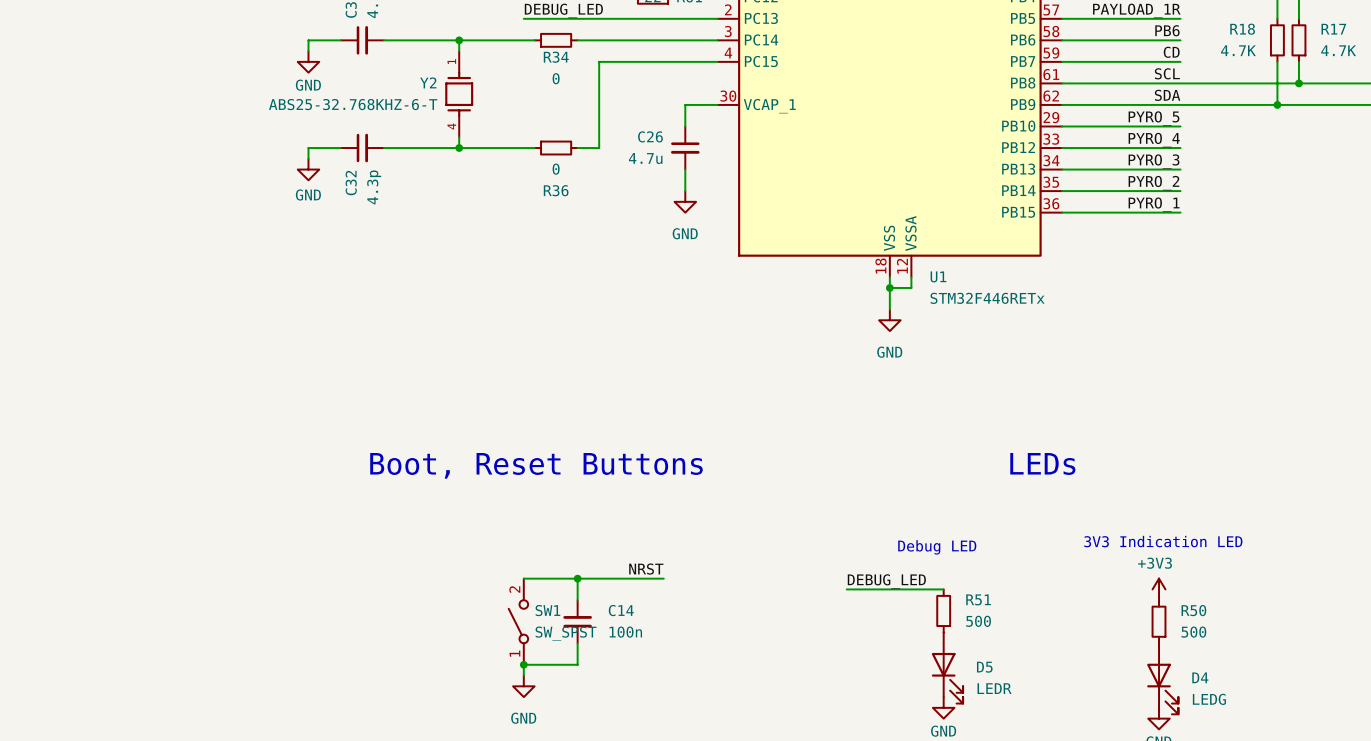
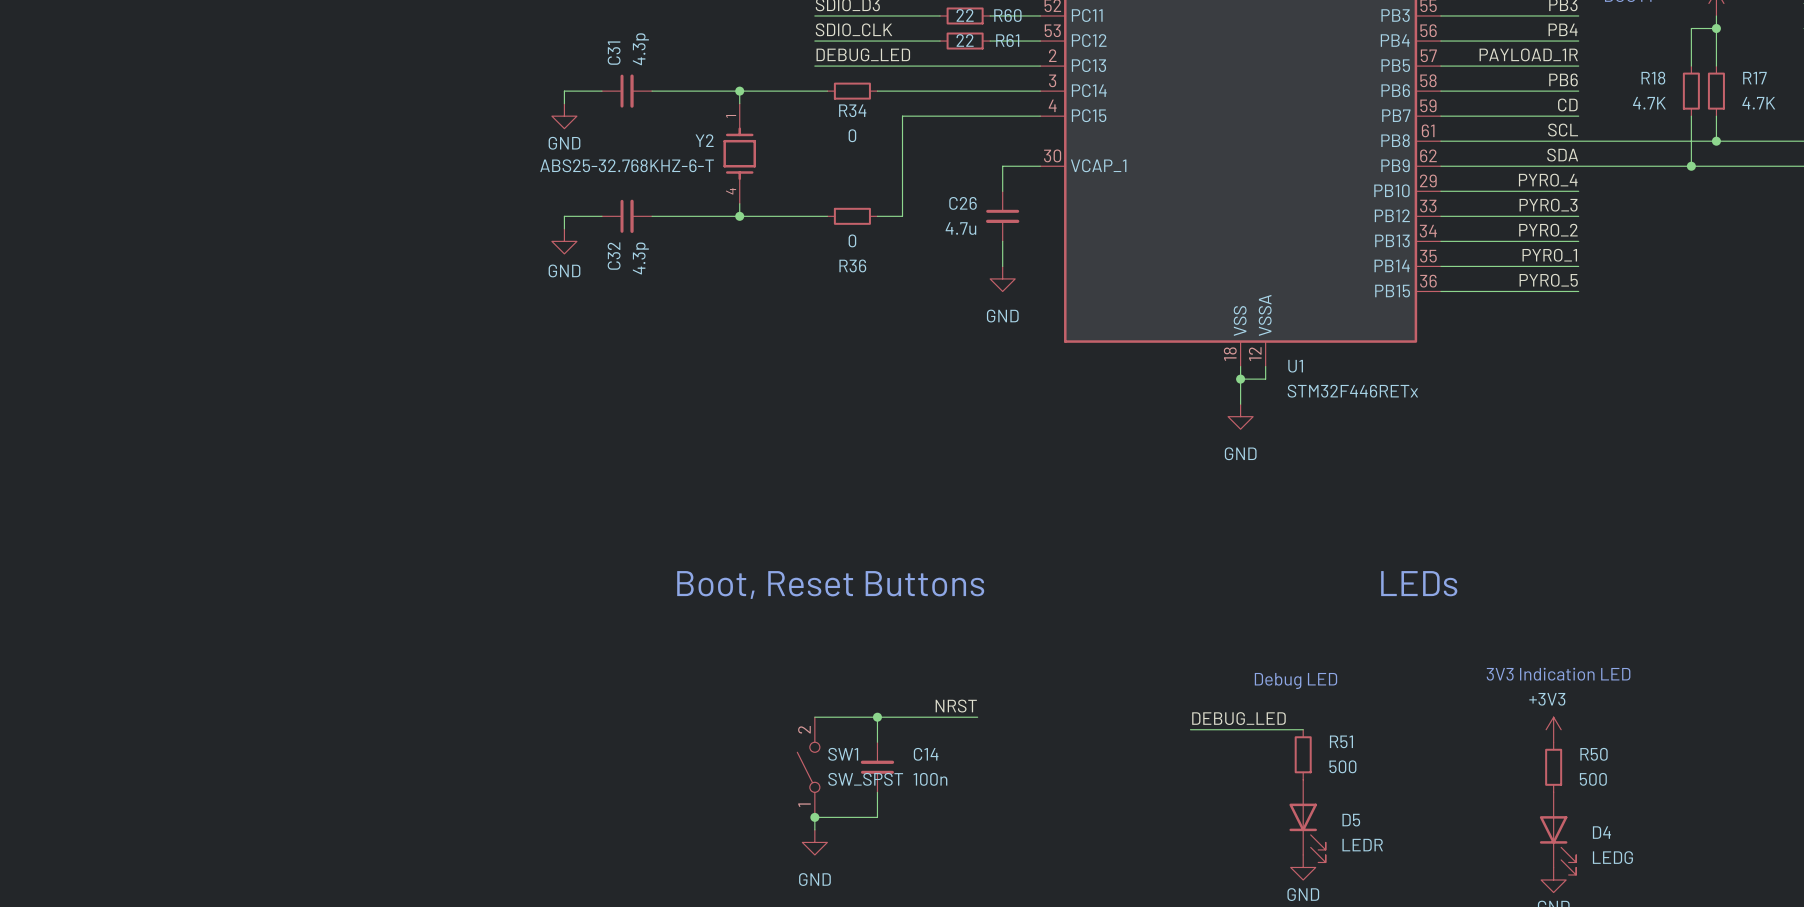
label: PYRO_5 (1153, 118) -> PYRO_4 (1548, 180)
label: PYRO_4 (1154, 140) -> PYRO_3 (1548, 205)
label: PYRO_3 (1154, 161) -> PYRO_2 (1548, 230)
label: PYRO_2 (1153, 183) -> PYRO_1 (1549, 255)
label: PYRO_1 (1154, 204) -> PYRO_5 (1548, 280)

